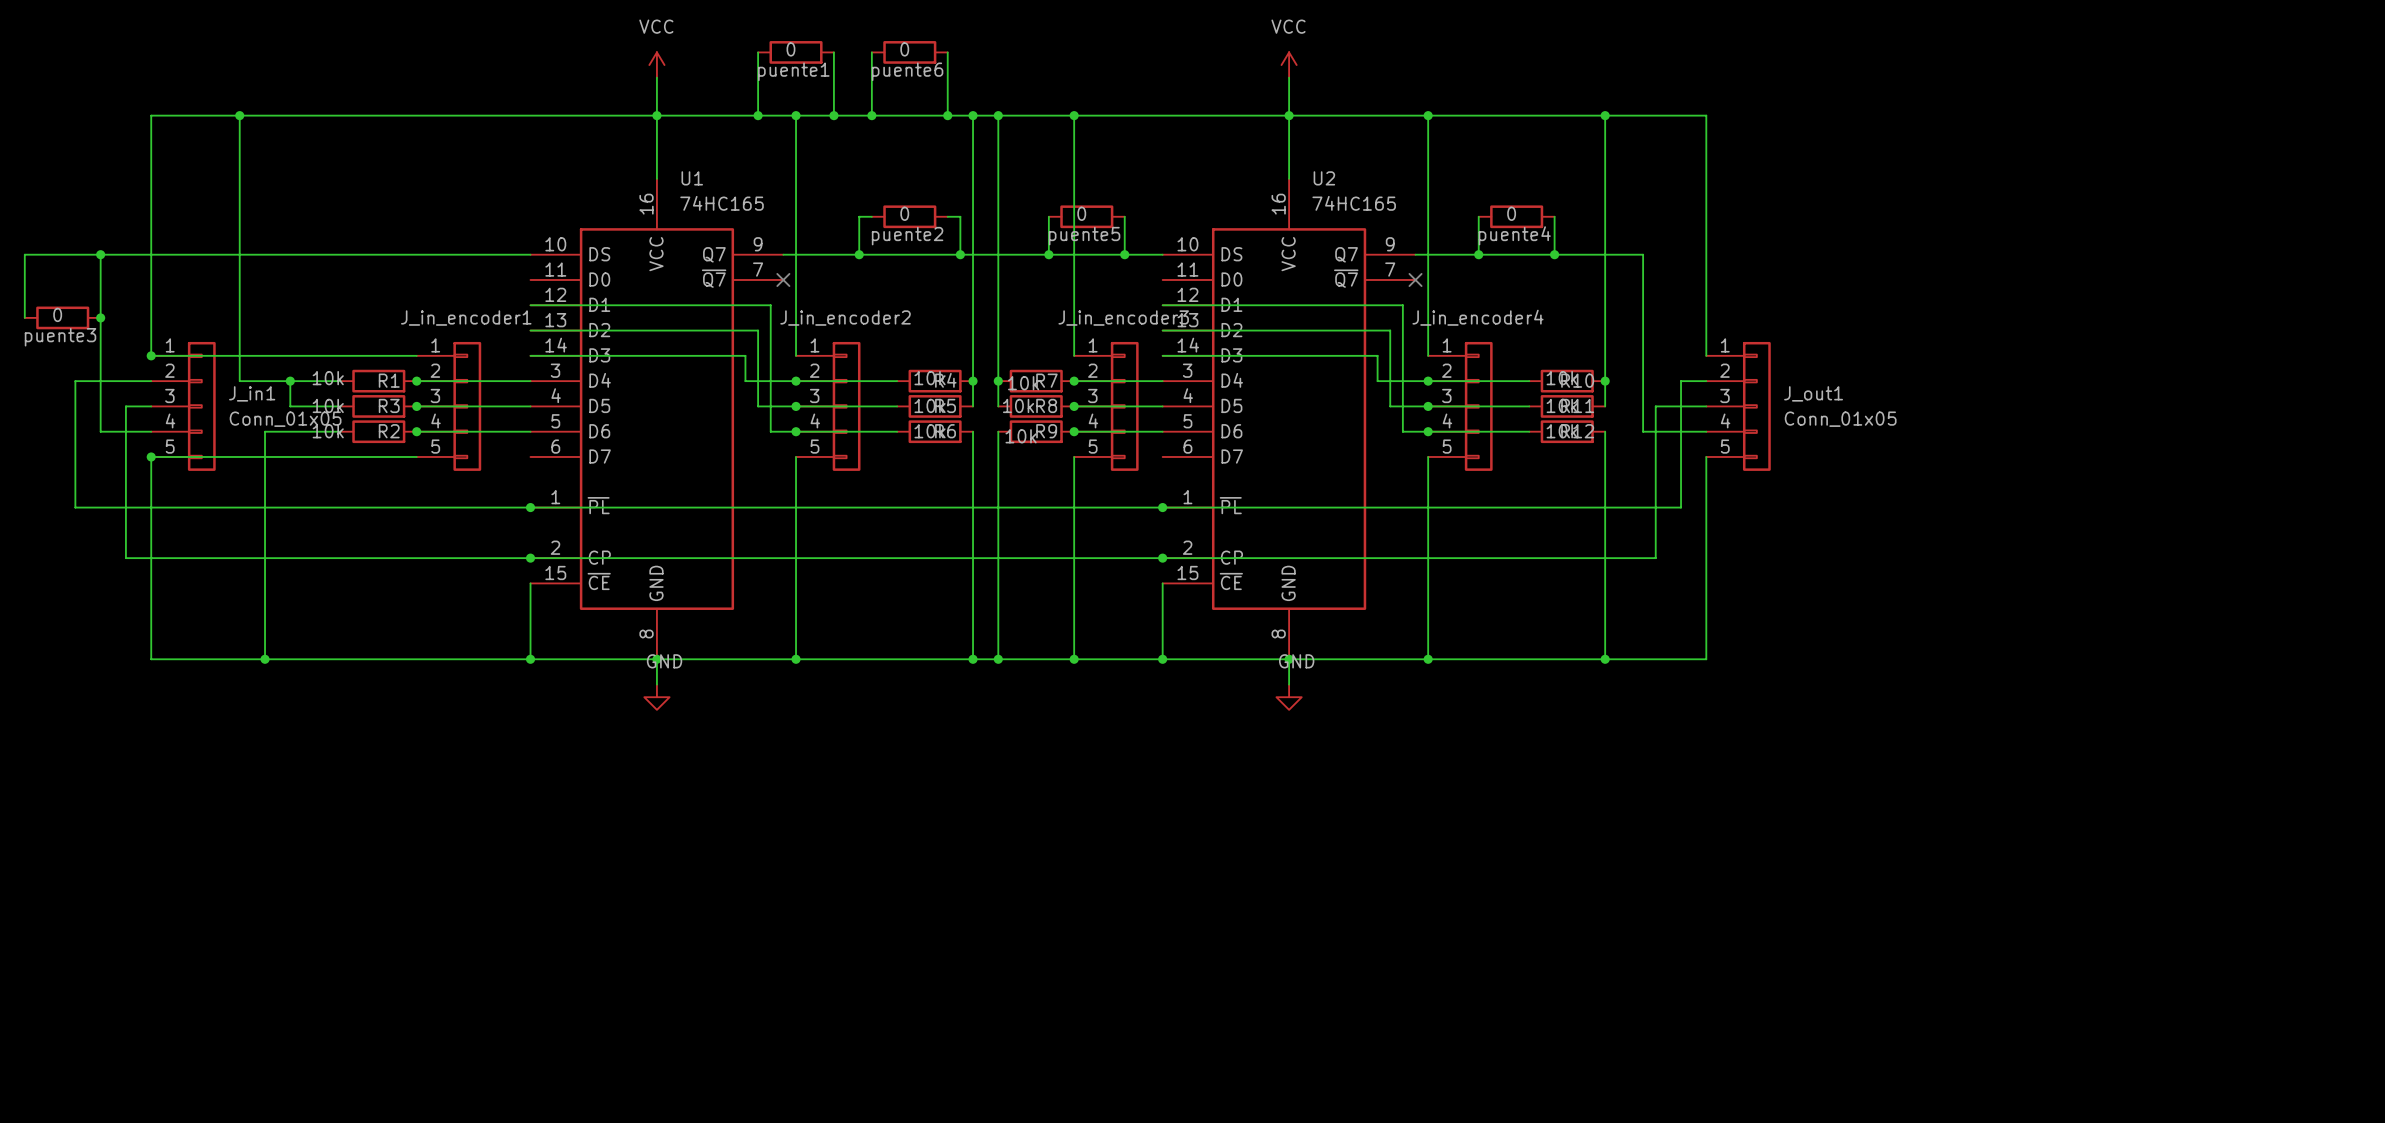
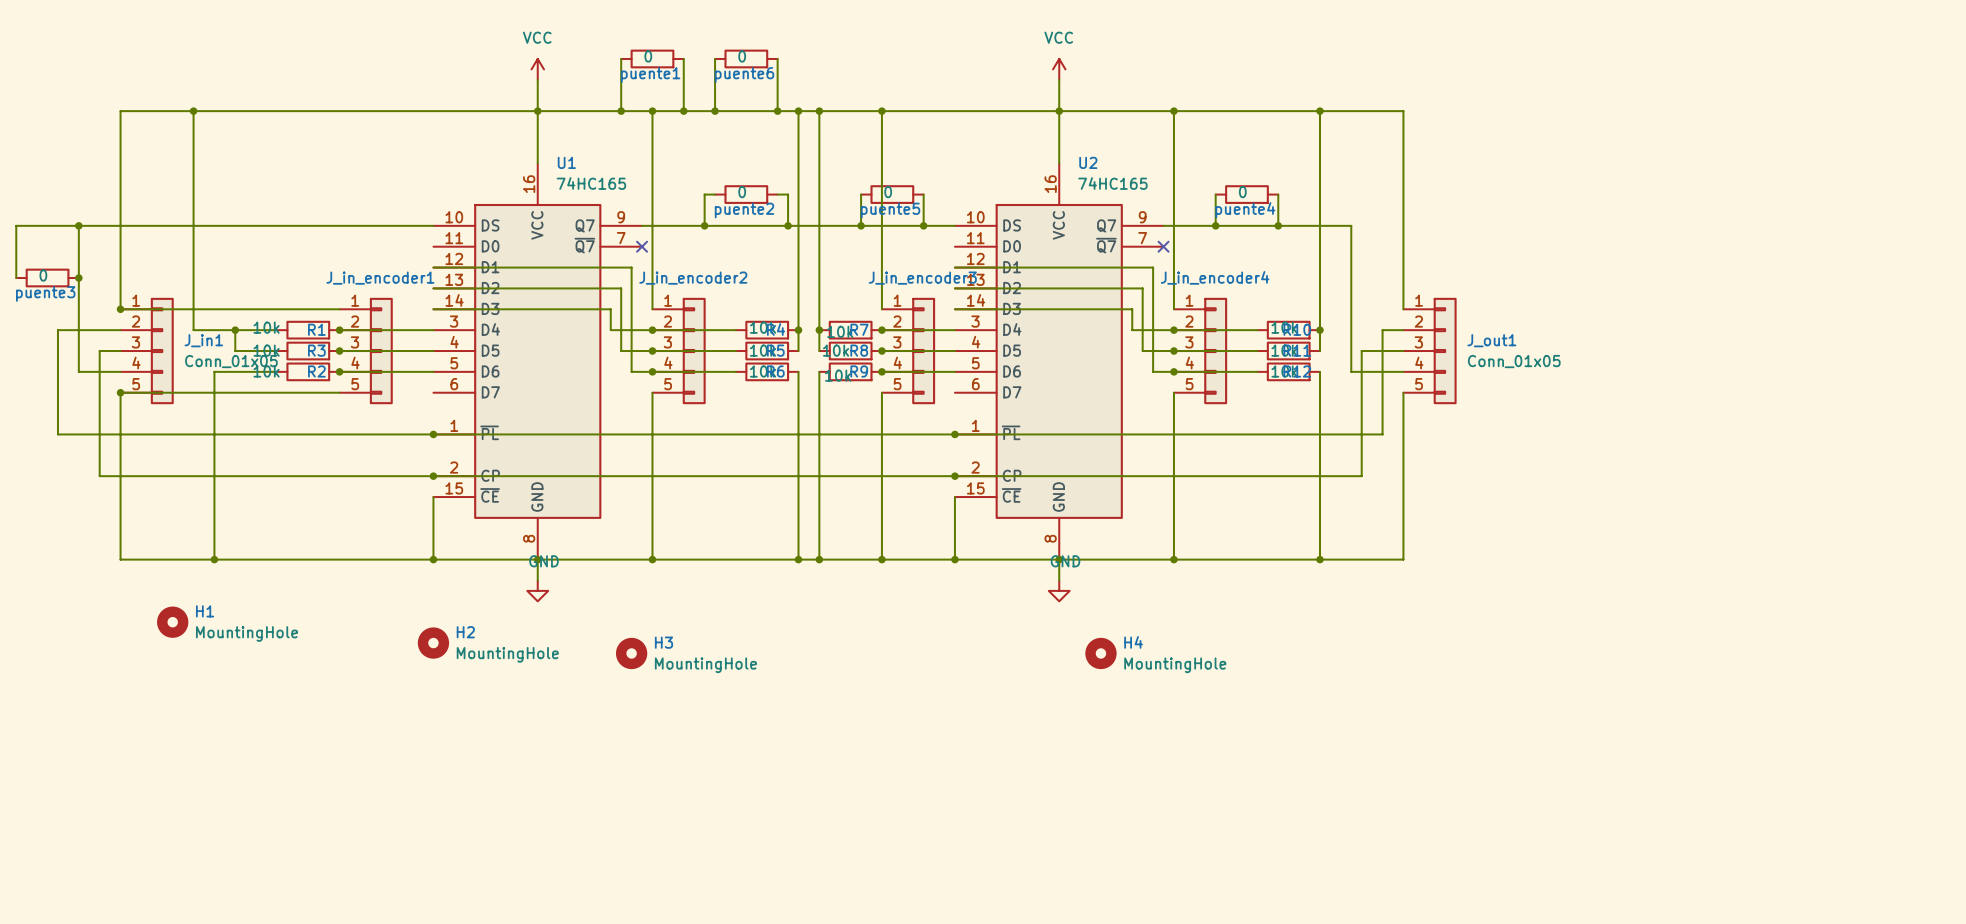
H1: none -> MountingHole (172, 622)
H2: none -> MountingHole (433, 643)
H3: none -> MountingHole (631, 653)
H4: none -> MountingHole (1100, 653)

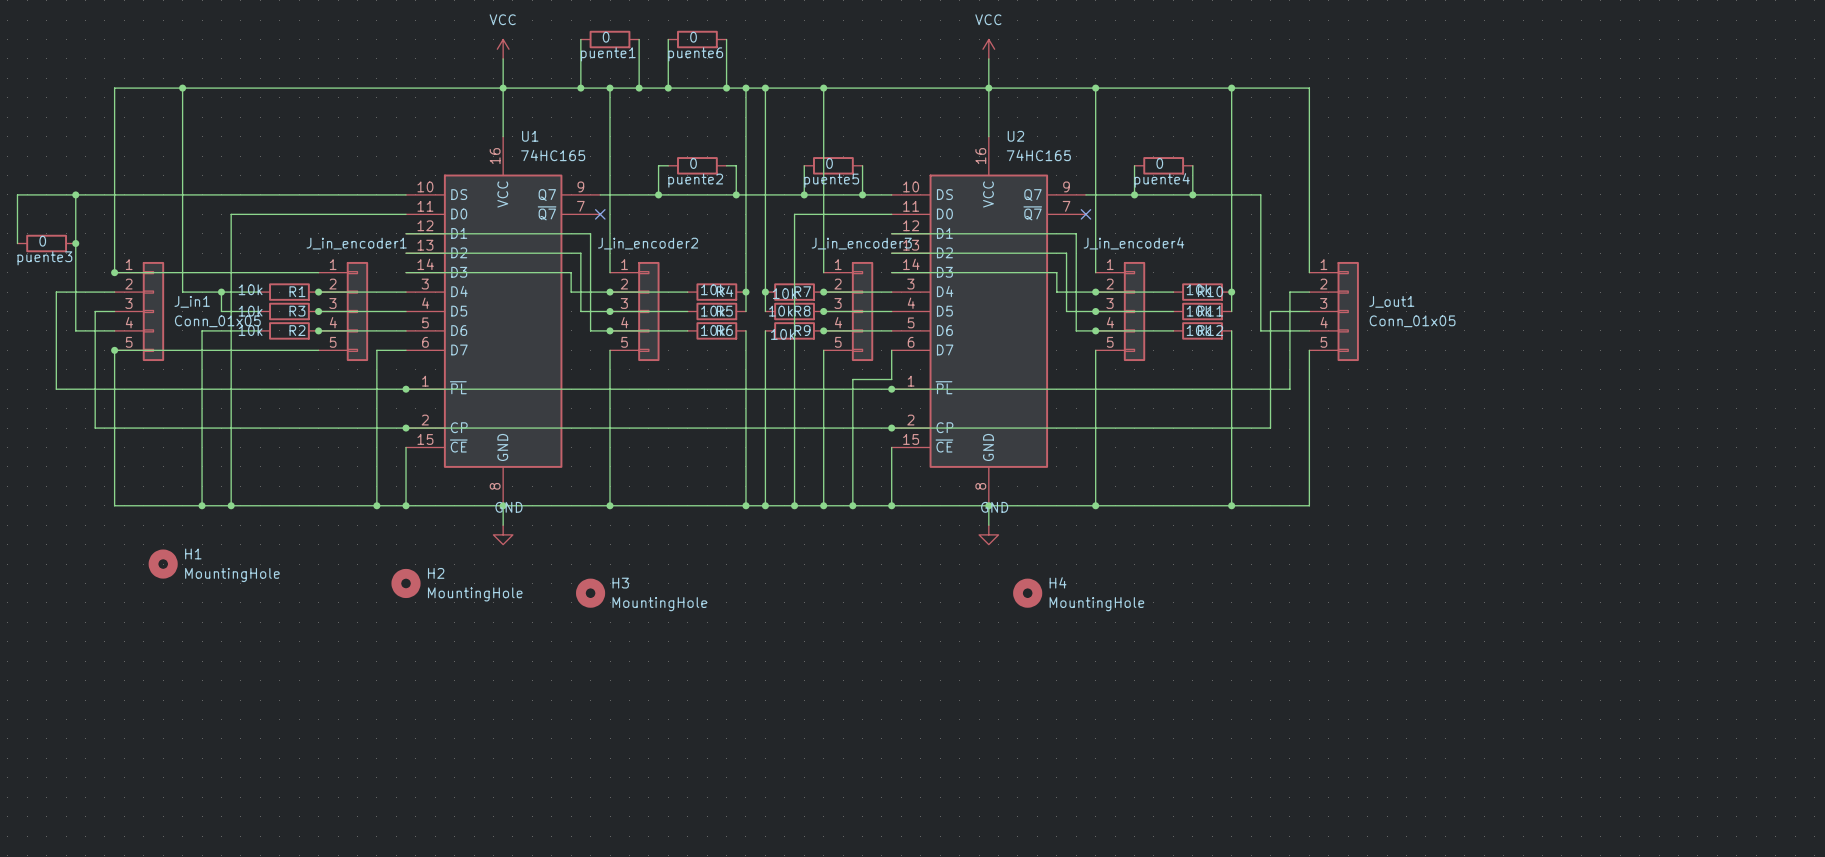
wire: none -> (406, 214) (231, 214) (231, 505)
wire: none -> (891, 214) (794, 214) (794, 505)
wire: none -> (406, 350) (376, 350) (376, 505)
wire: none -> (891, 350) (891, 379) (852, 379) (852, 505)
junction: none -> (231, 505)
junction: none -> (376, 505)
junction: none -> (794, 505)
junction: none -> (852, 505)

